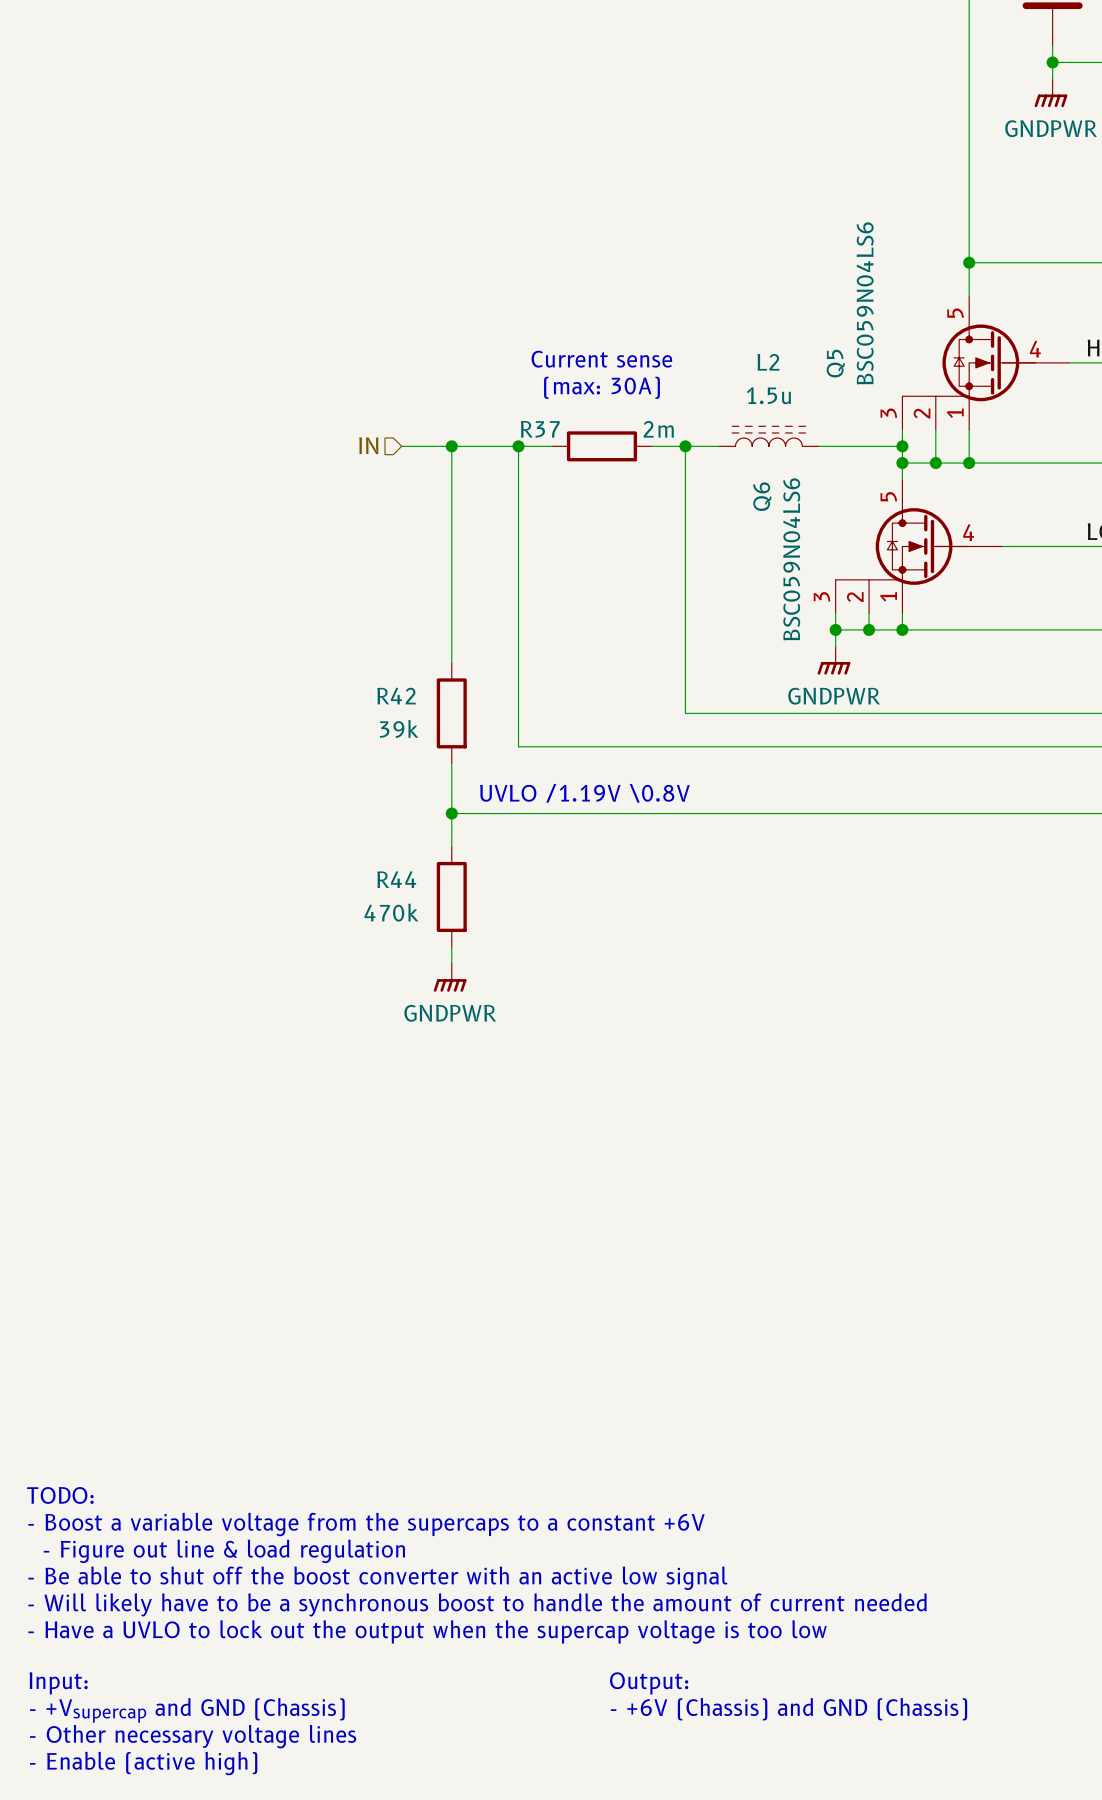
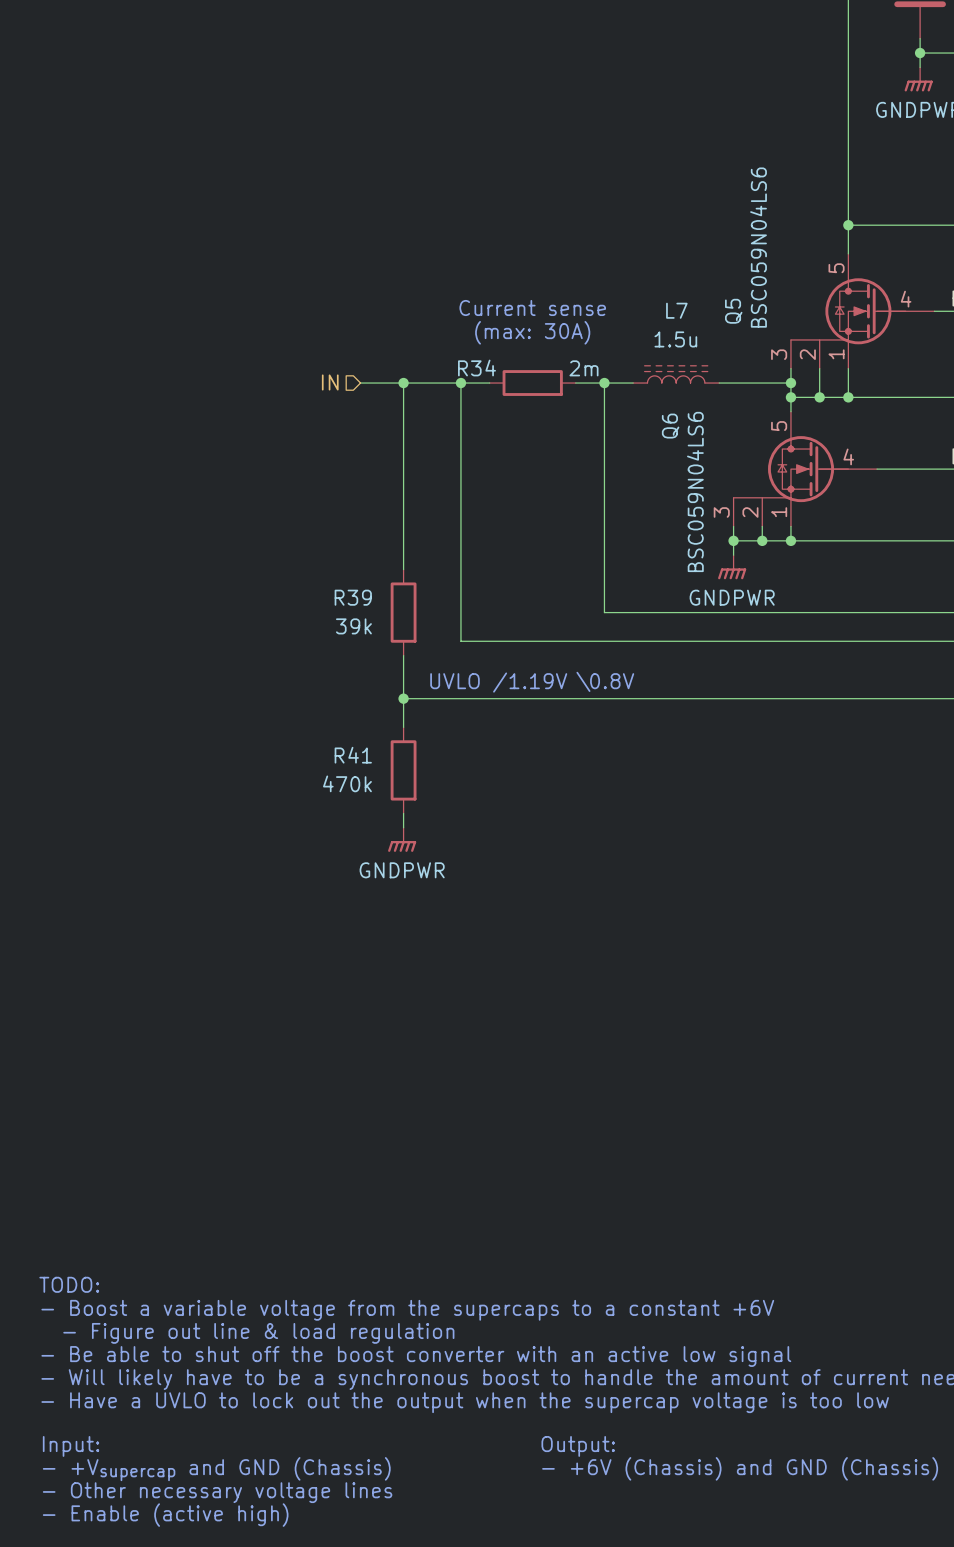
L2 name: L2 (768, 362) -> L7 (676, 310)
R37 name: R37 (540, 429) -> R34 (476, 368)
R42 name: R42 (396, 696) -> R39 (353, 597)
R44 name: R44 (396, 879) -> R41 (353, 755)

